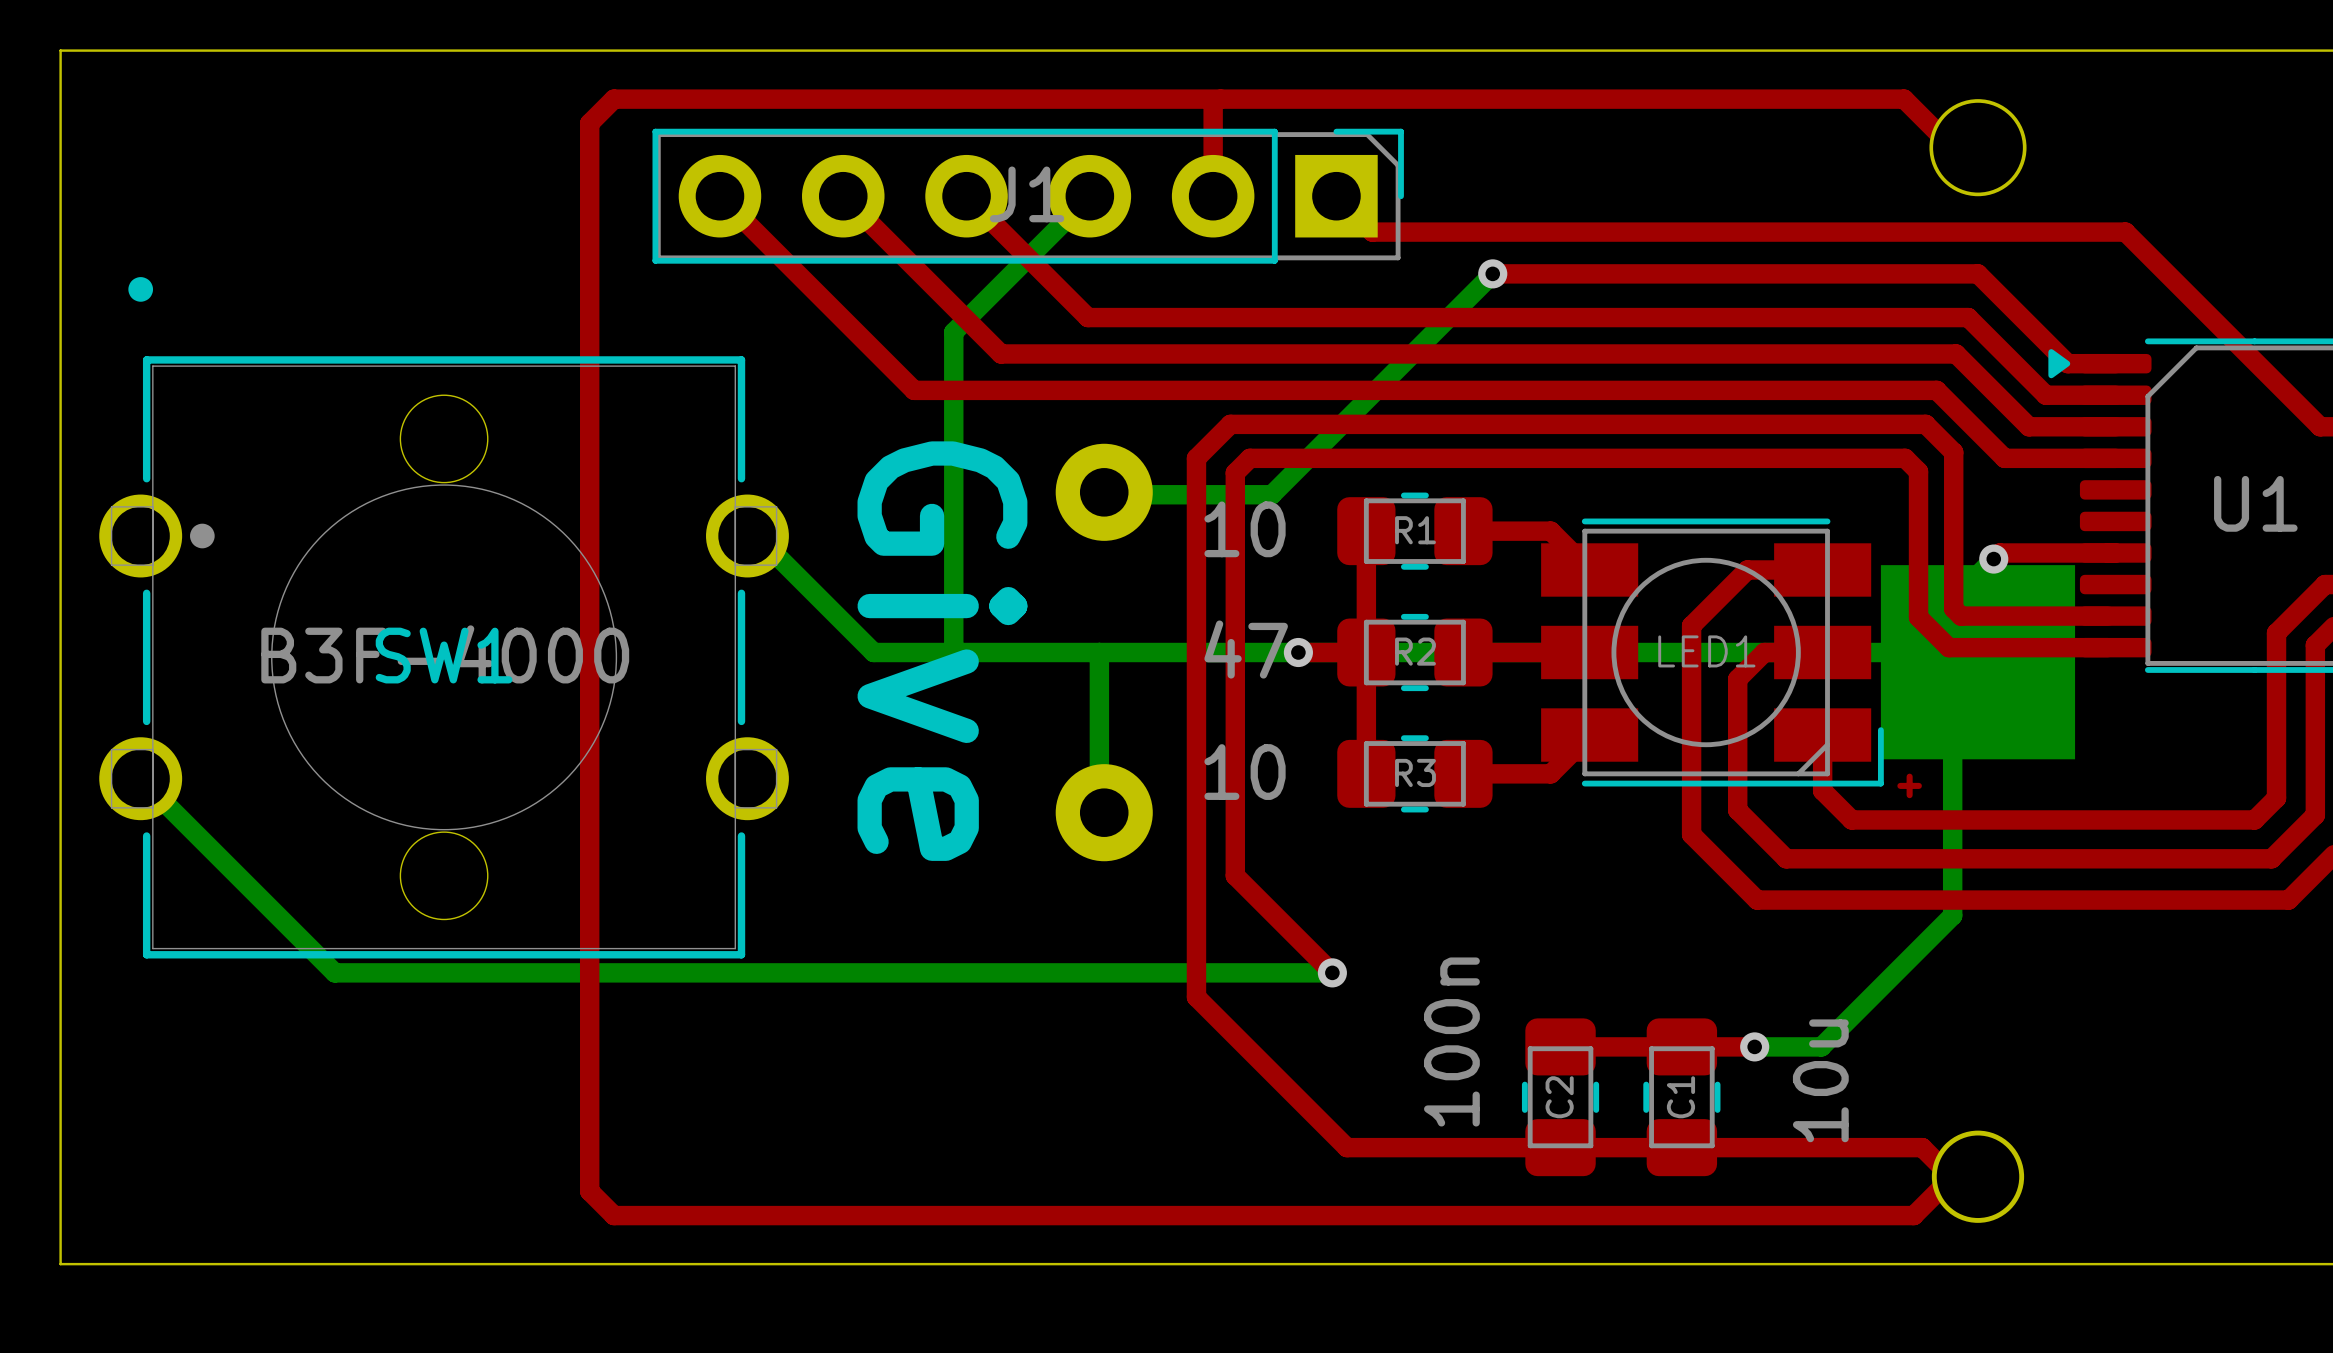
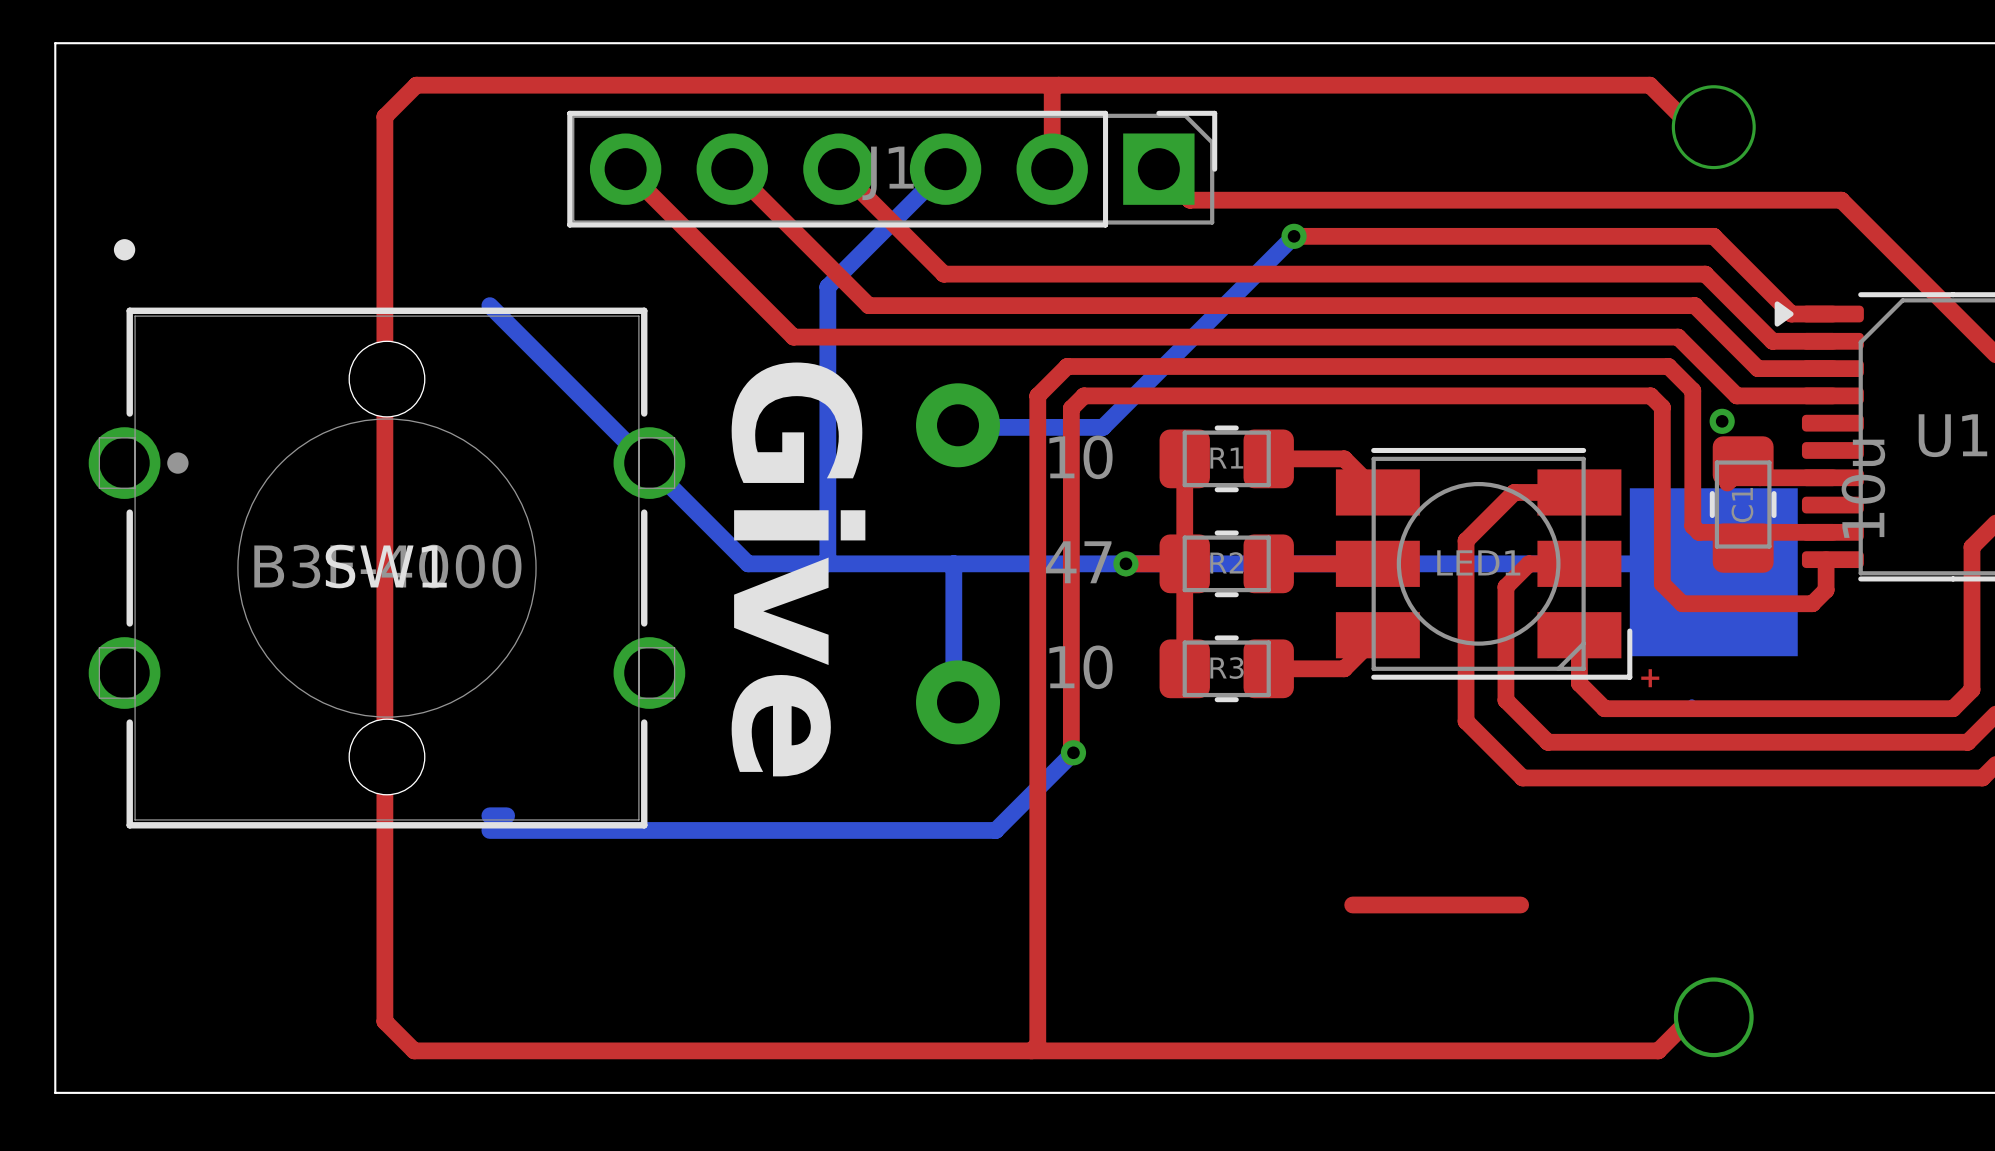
top track: (613, 99) (589, 123) (589, 1191) (613, 1215) -> (533, 85) (416, 85) (384, 116) (384, 1021) (414, 1050) (533, 1050)
bottom track: (774, 536) (774, 553) (873, 652) -> (489, 305) (748, 563) (758, 563)
bottom track: (1993, 559) (1952, 600) (1952, 915) (1821, 1046) (1754, 1046) -> none
via position: (1993, 559) -> (1722, 421)
top track: (1918, 617) (1948, 647) (2107, 647) -> (1662, 533) (1662, 583) (1682, 603) (1812, 603) (1826, 590) (1826, 559)
text position: Give (942, 651) -> Give (798, 569)
bottom track: (167, 778) (140, 778) (334, 972) (1332, 972) -> none
bottom track: none -> (1073, 752) (995, 830) (489, 830)
top track: (1235, 875) (1332, 972) -> none
bottom track: none -> (489, 815) (506, 815)
via position: (1332, 972) -> (1073, 752)
top track: (1196, 997) (1346, 1147) (1922, 1147) (1952, 1177) -> (1037, 861) (1037, 1044) (1031, 1050)
via: (1754, 1046) -> none
C2: 100n (1560, 1097) -> none
C1 position: (1681, 1097) -> (1743, 504)

